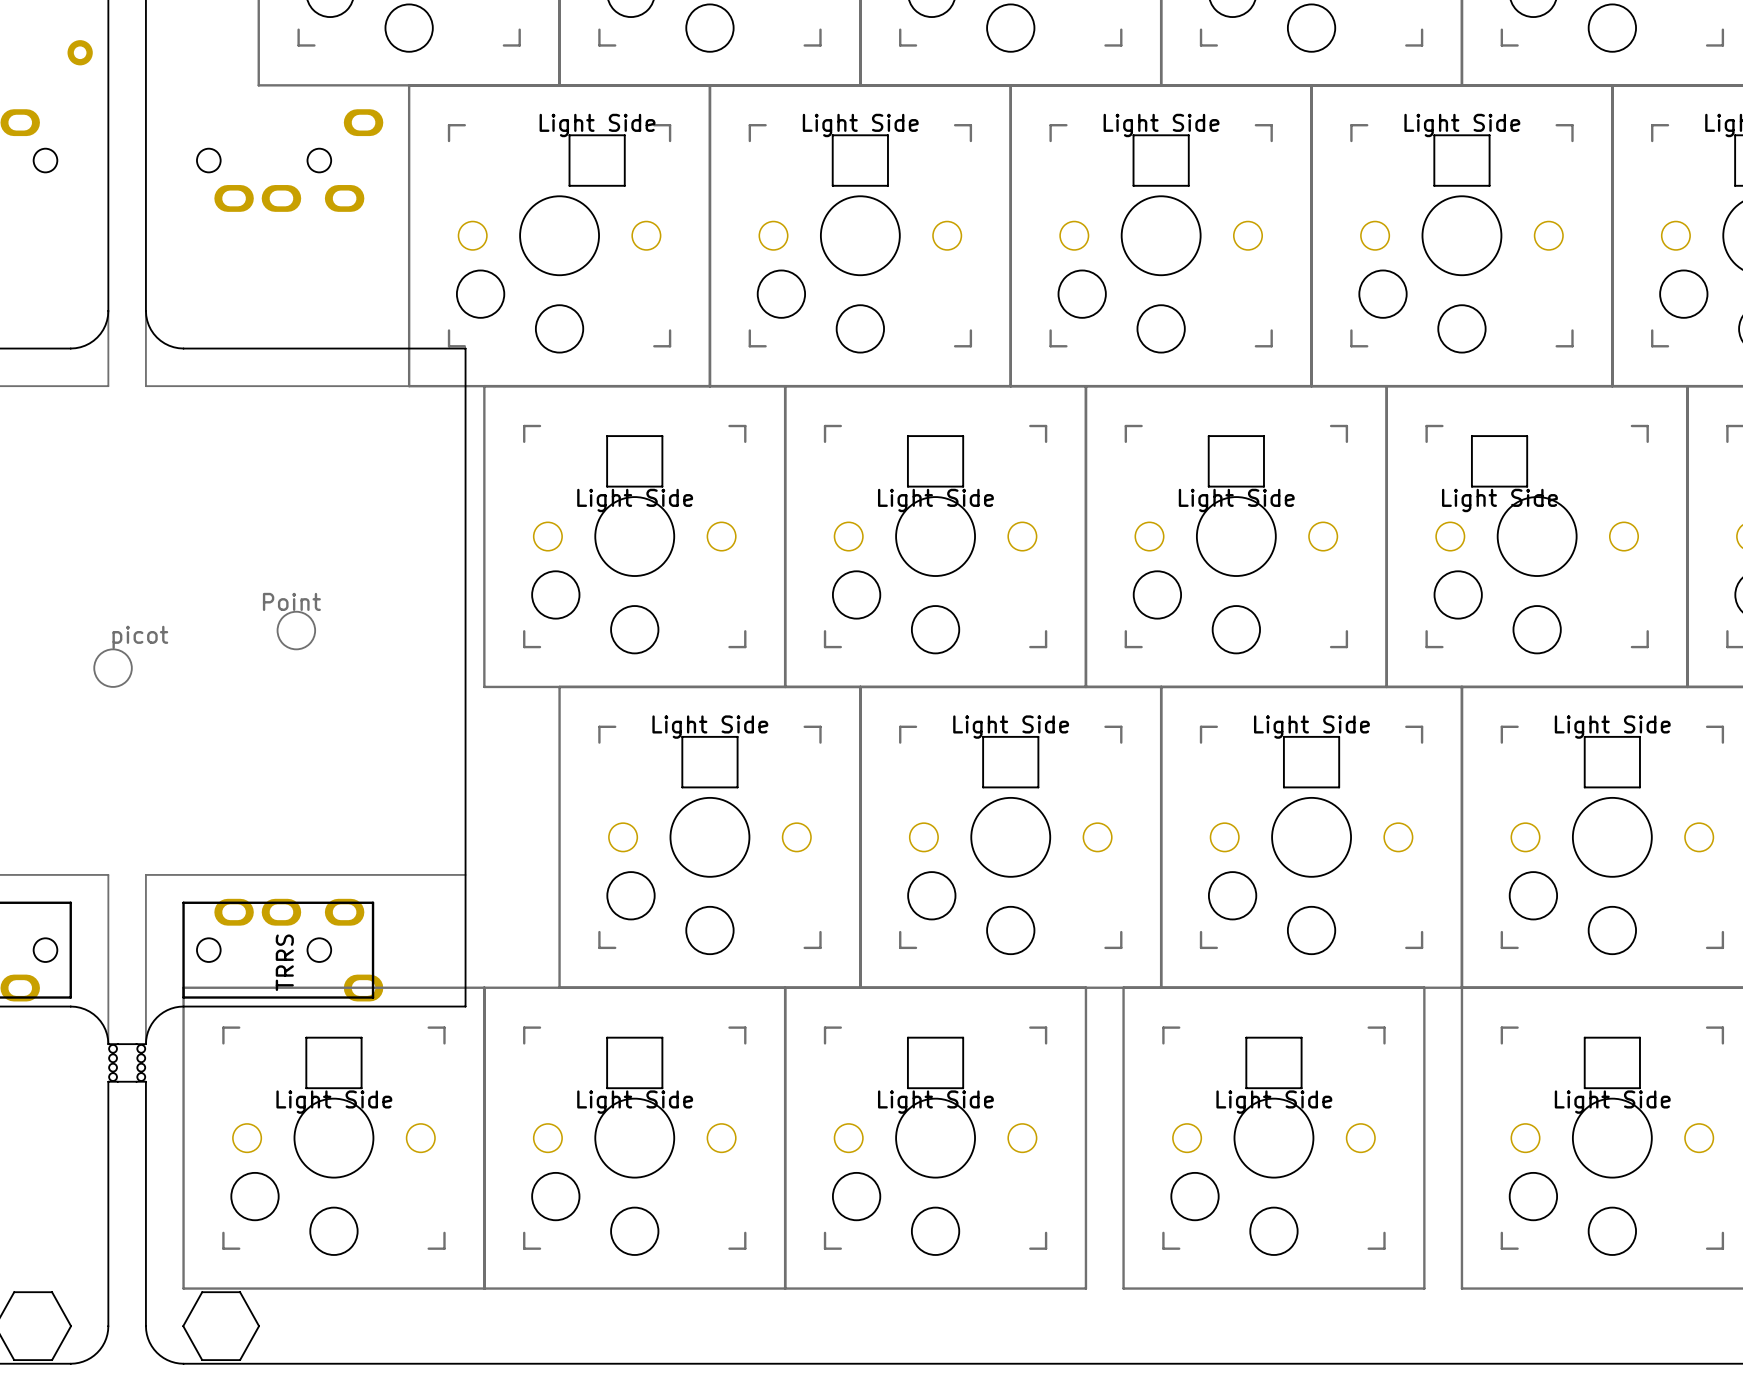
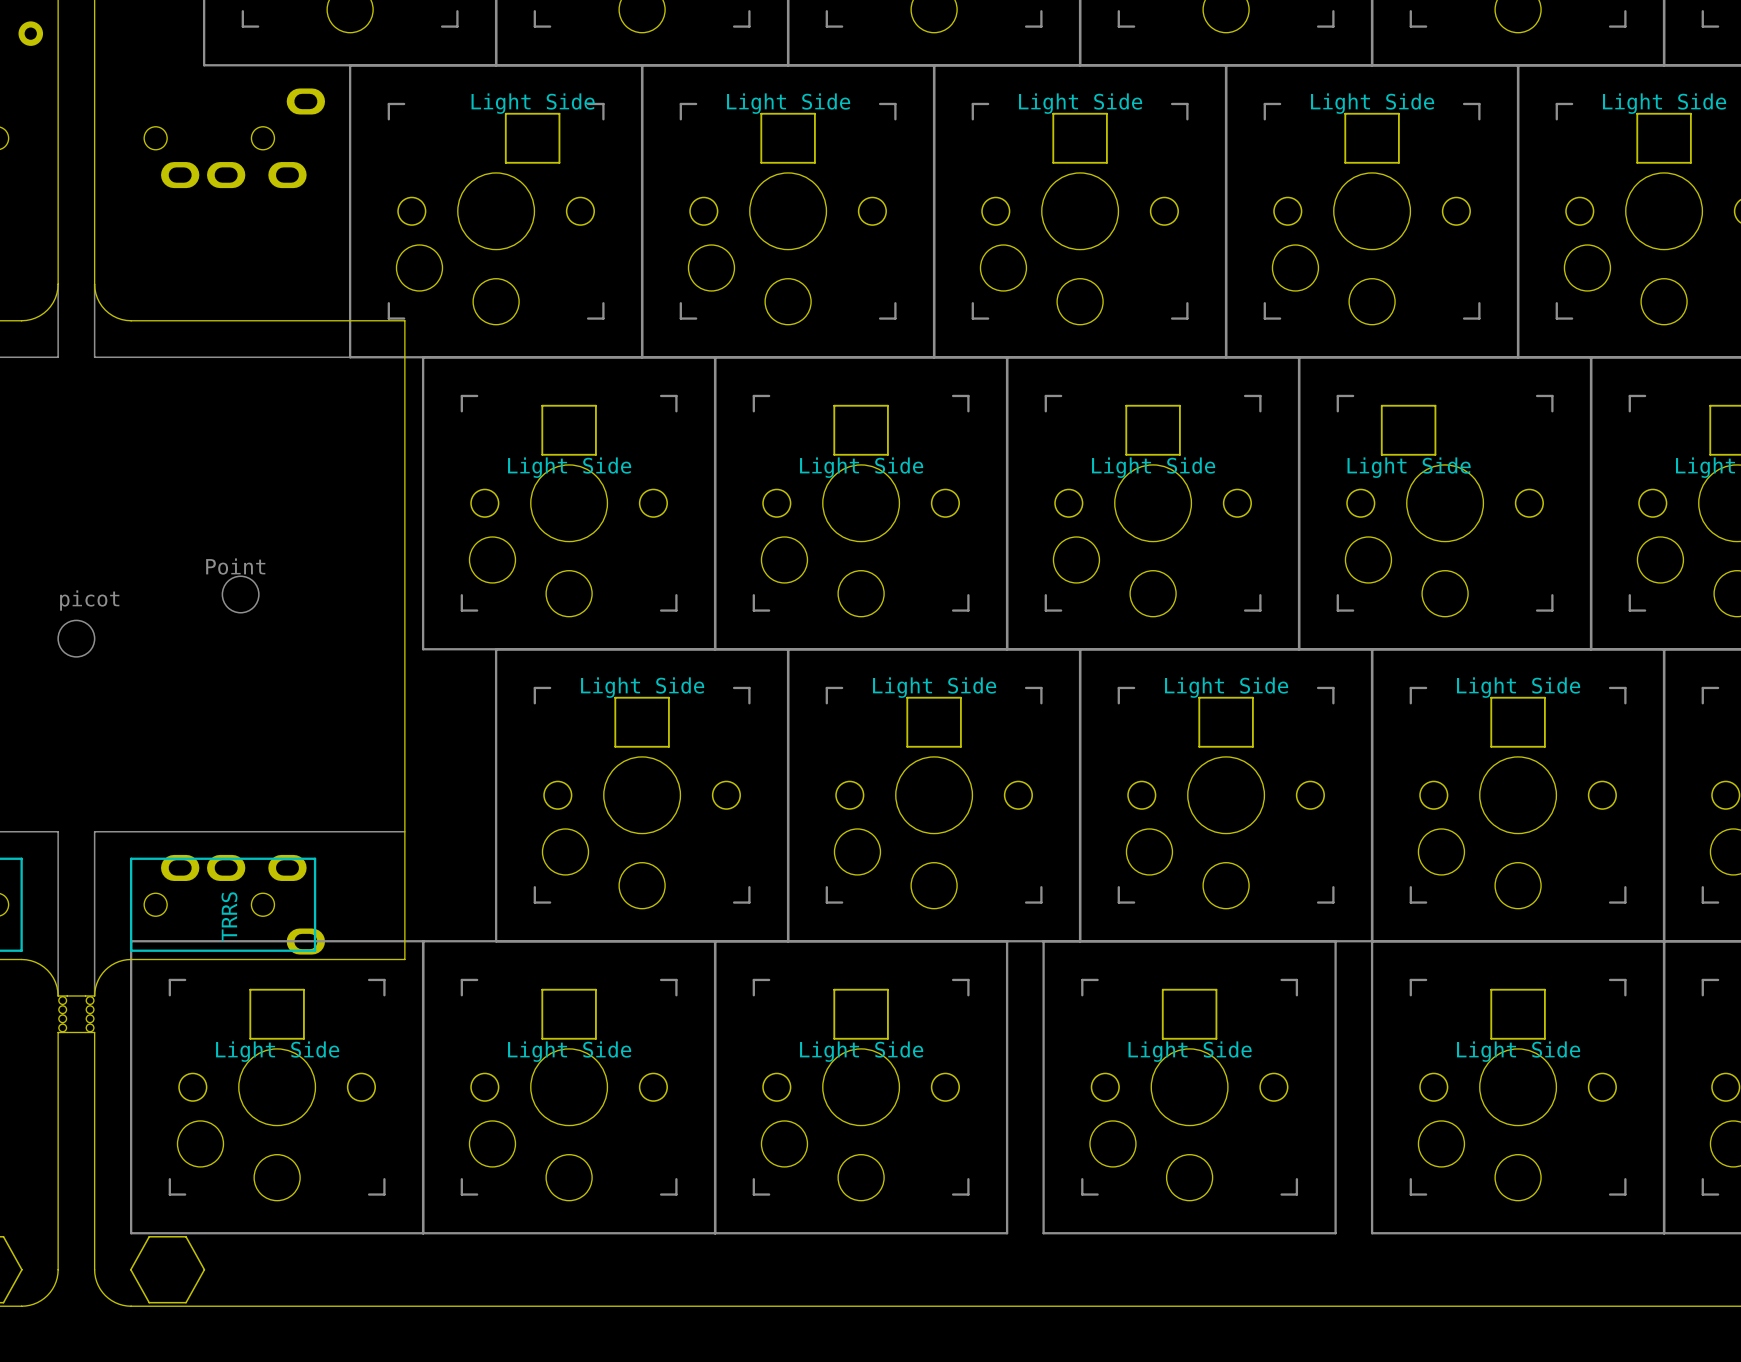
drawing position: (113, 668) -> (76, 638)

